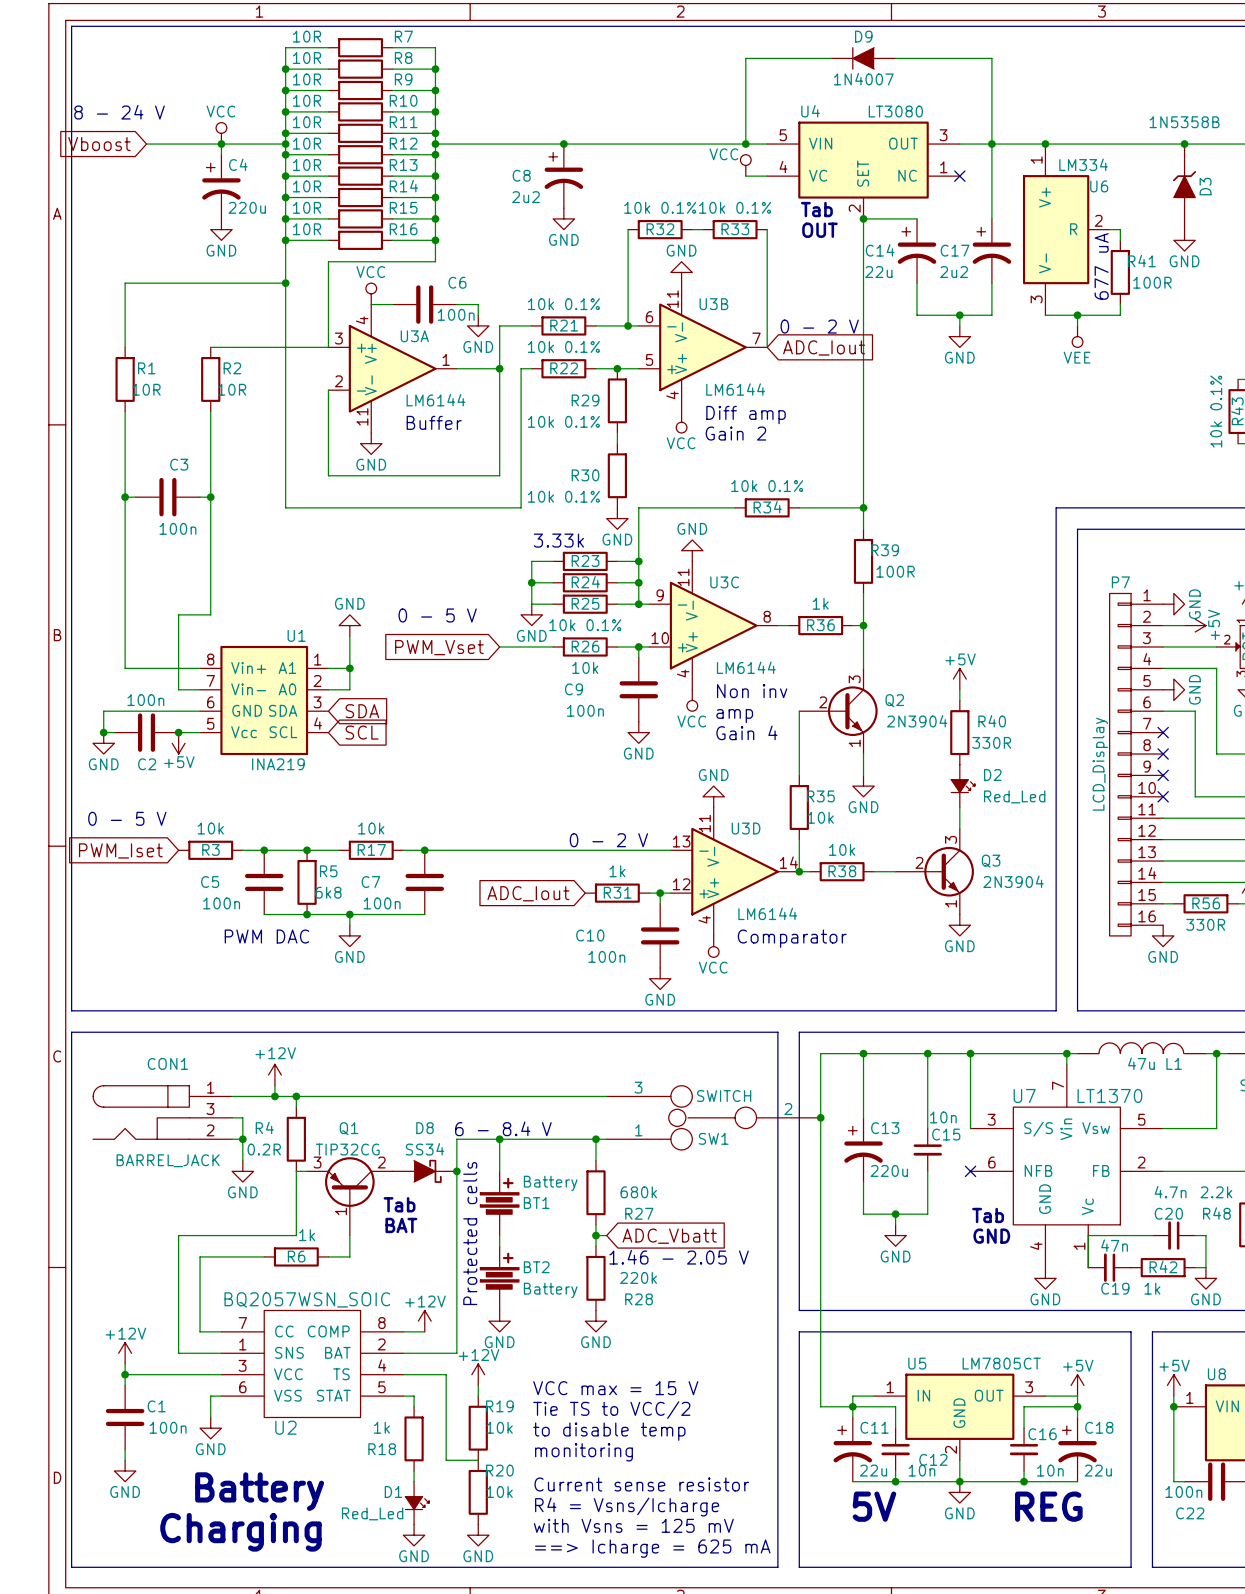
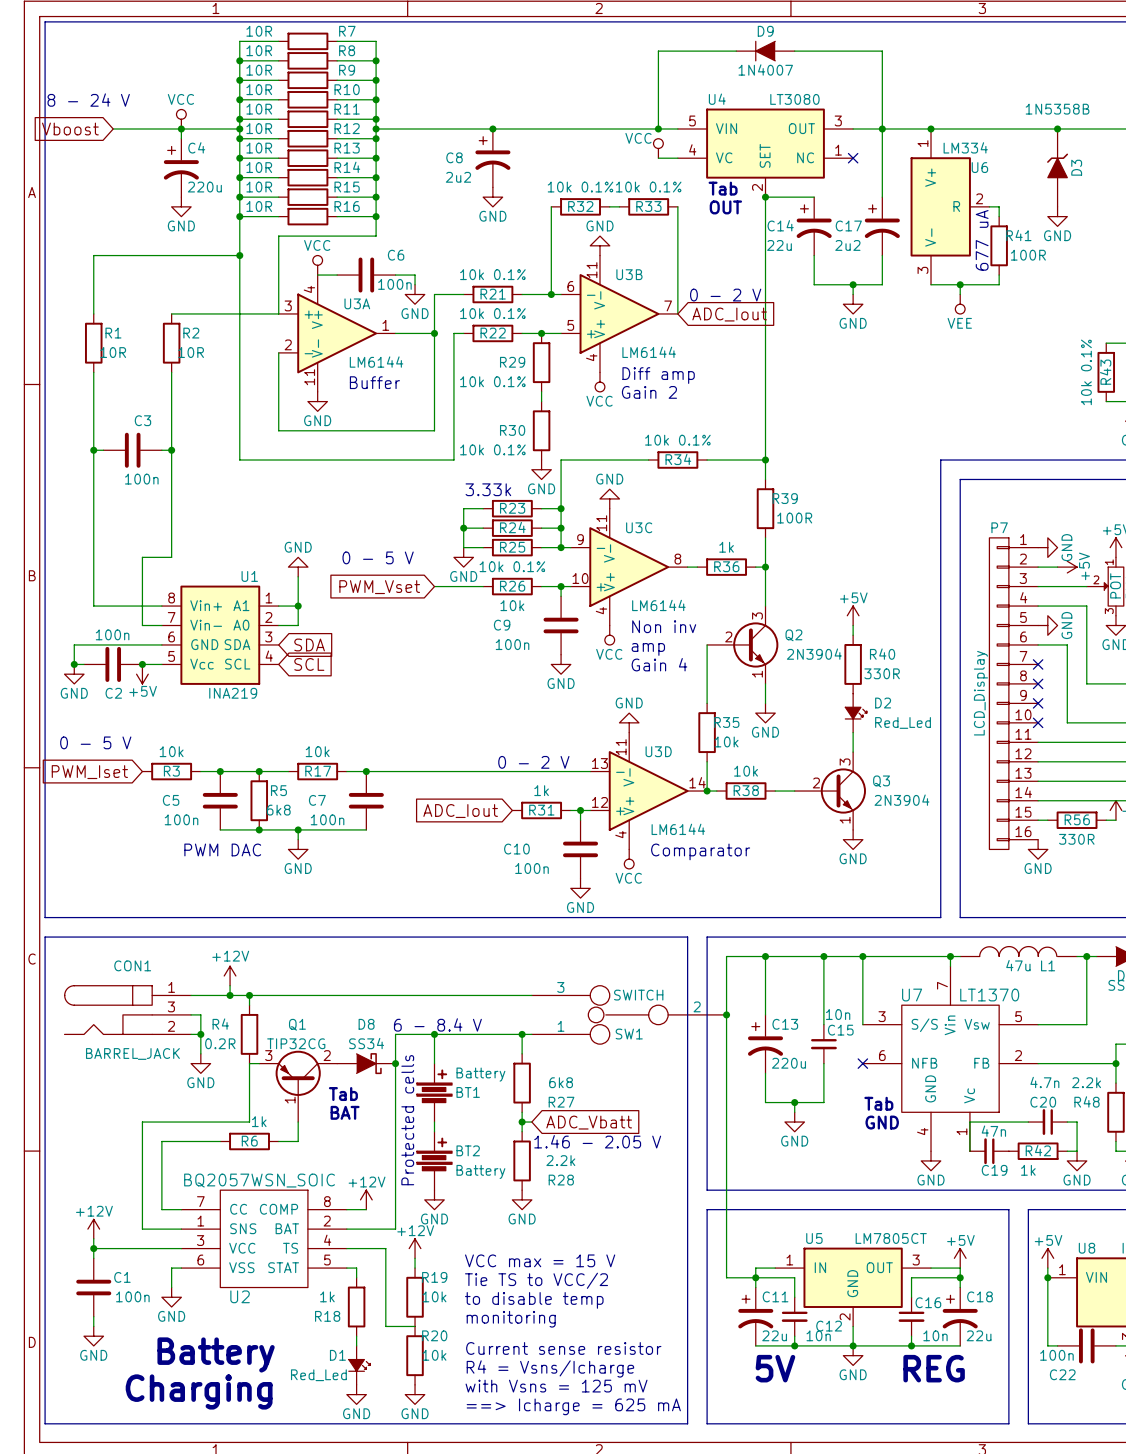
R27 value: 680k (638, 1192) -> 6k8 (561, 1082)
R28 value: 220k (638, 1277) -> 2.2k (560, 1160)

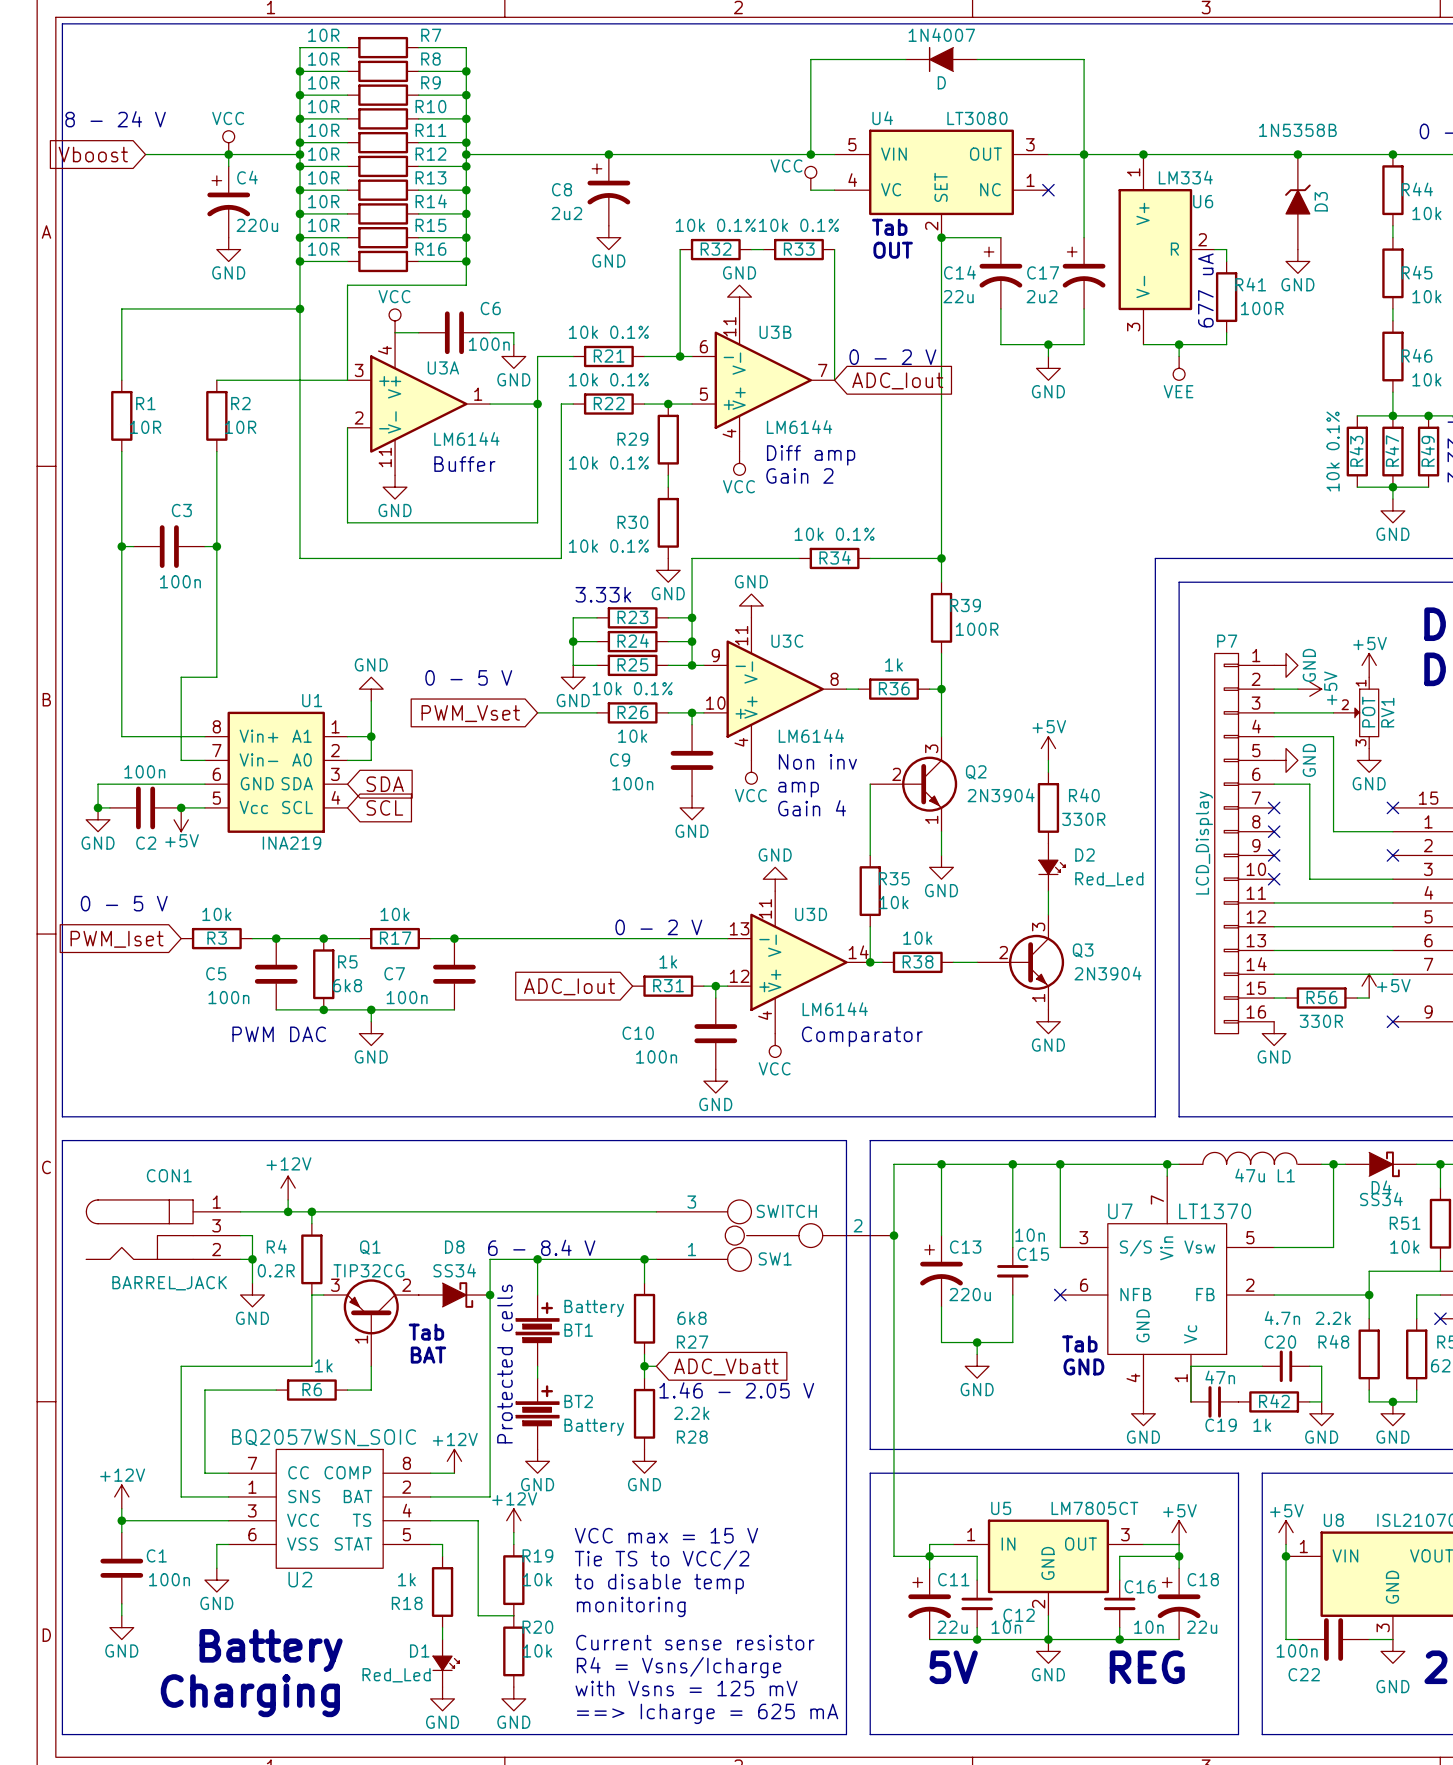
D9 name: D9 (765, 31) -> 1N4007 (941, 35)
D9 value: 1N4007 (765, 69) -> D (941, 82)

